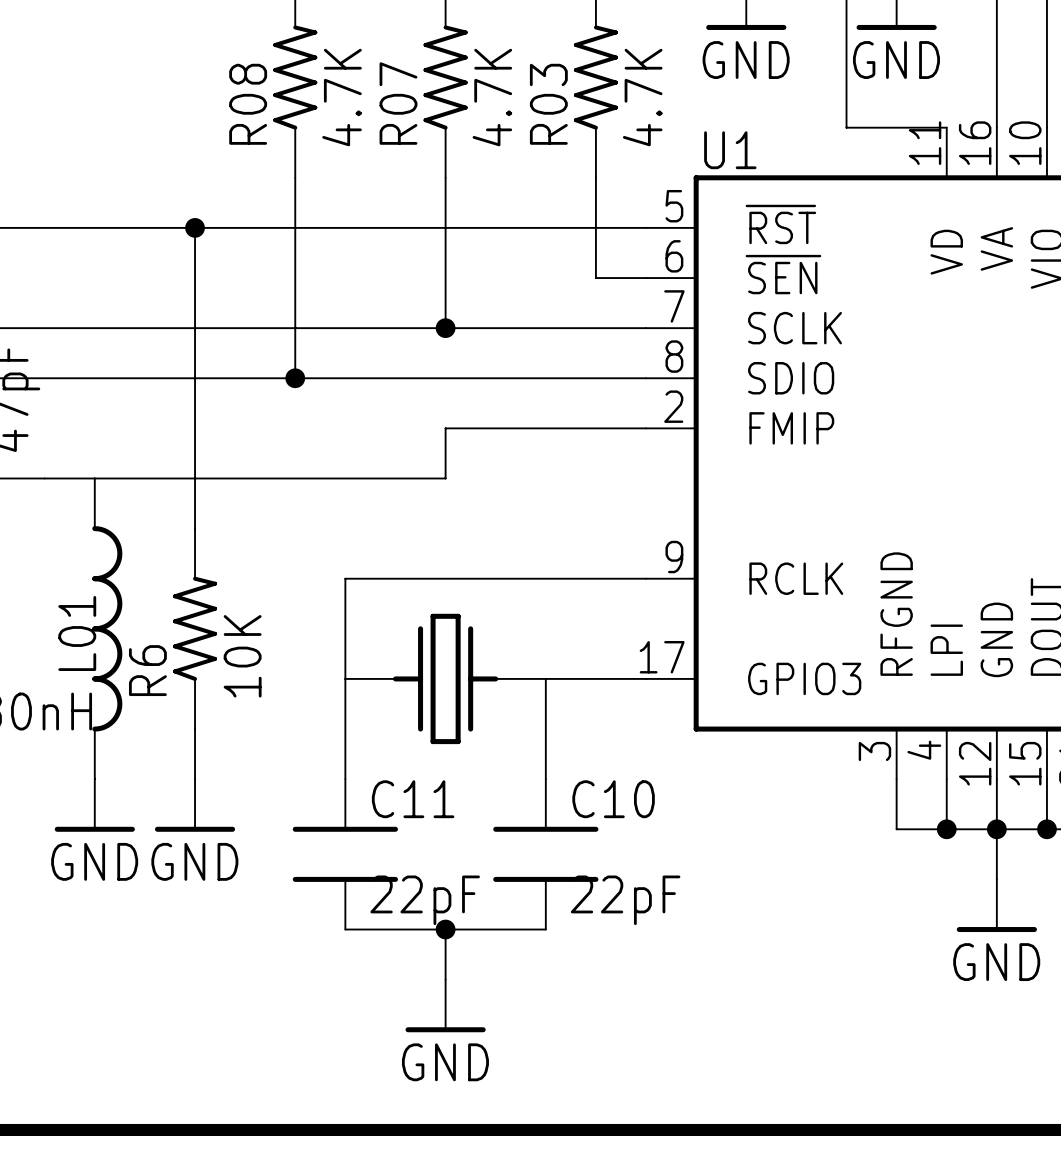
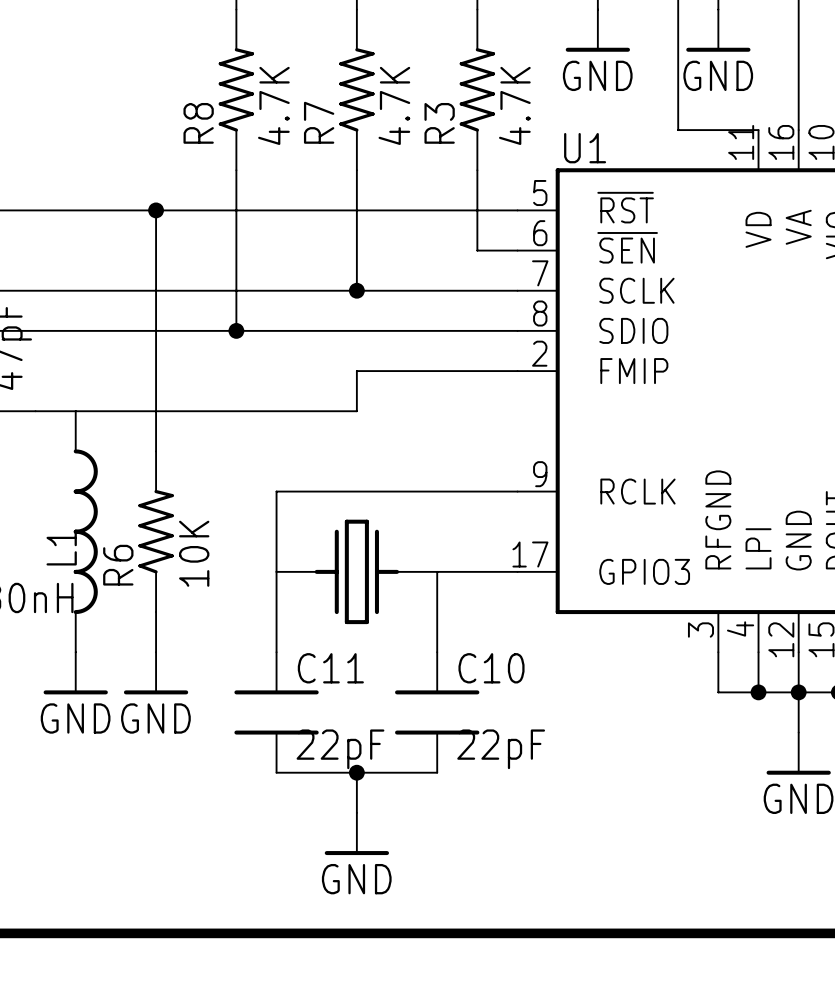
R07 name: R07 (398, 103) -> R7 (319, 122)
R08 name: R08 (248, 104) -> R8 (198, 123)
R03 name: R03 (548, 104) -> R3 (439, 123)
L01 name: L01 (77, 633) -> L1 (61, 547)

